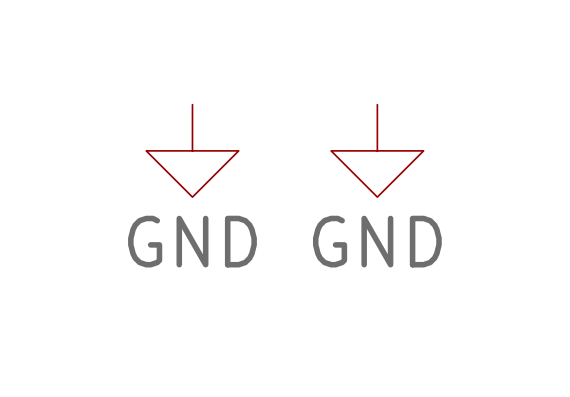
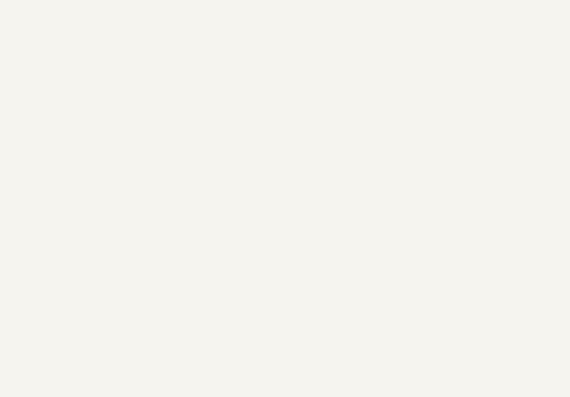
power symbol: GND (192, 150) -> none
power symbol: GND (377, 150) -> none

